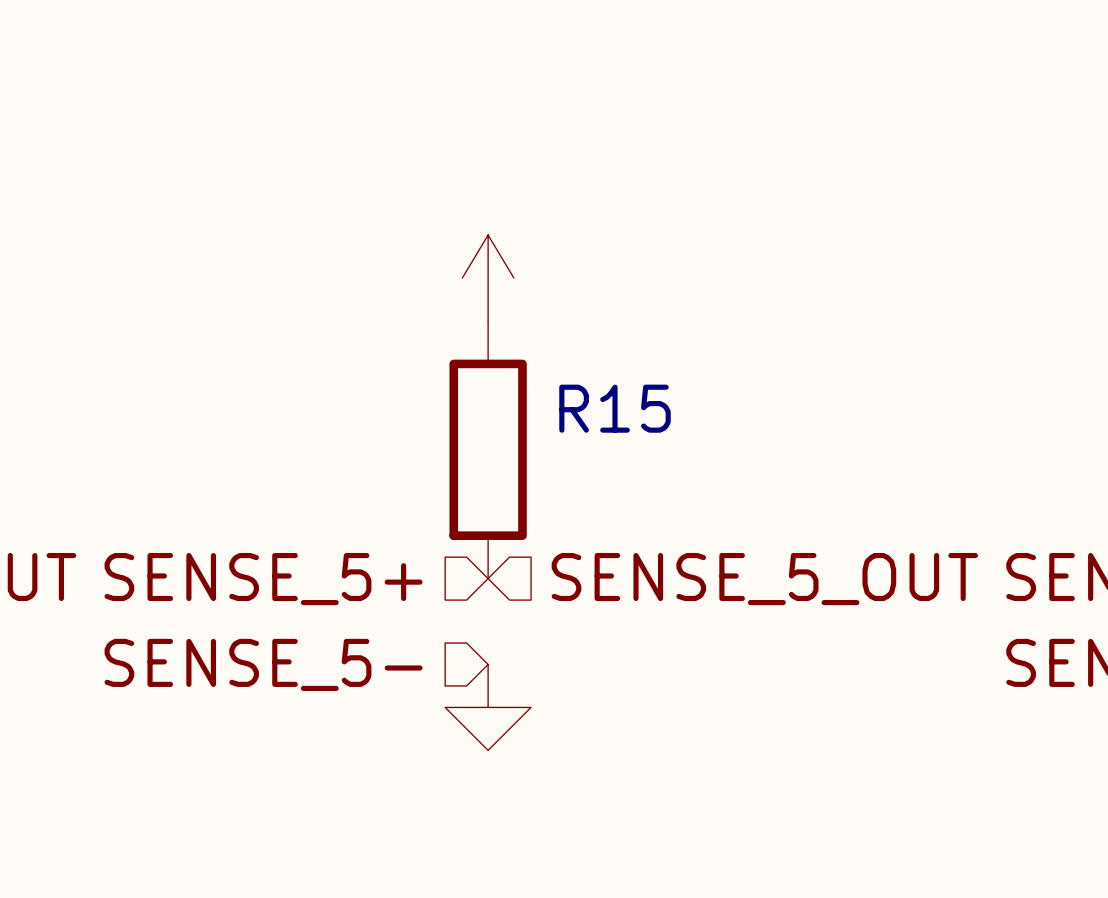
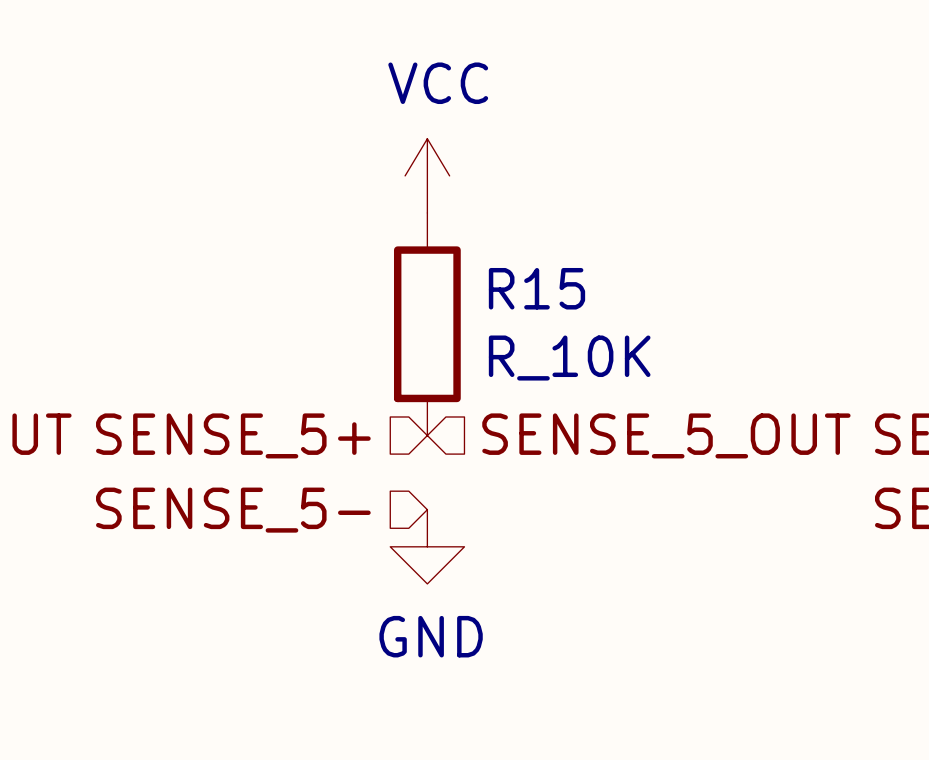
power symbol text: none -> VCC (438, 83)
R15 value: none -> R_10K (569, 358)
power symbol text: none -> GND (431, 636)

